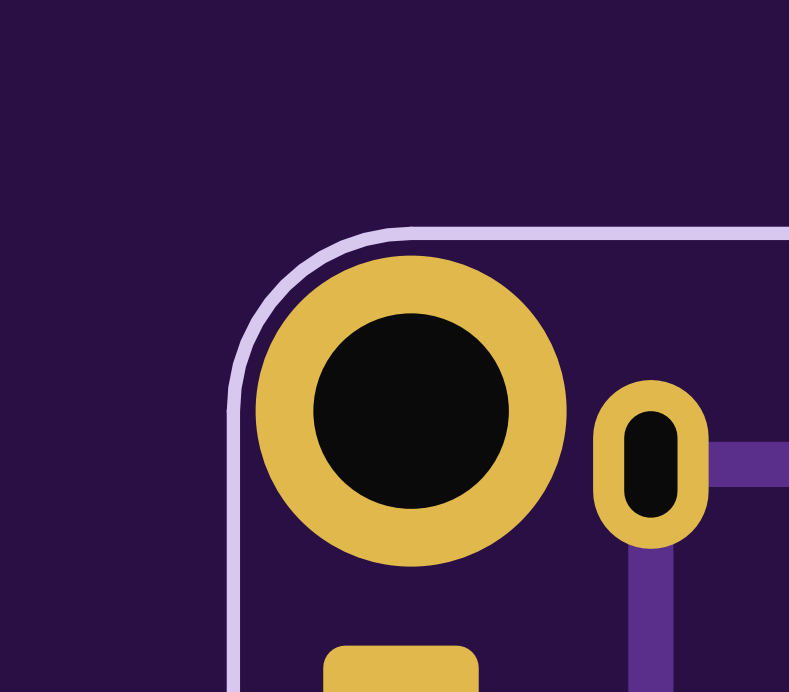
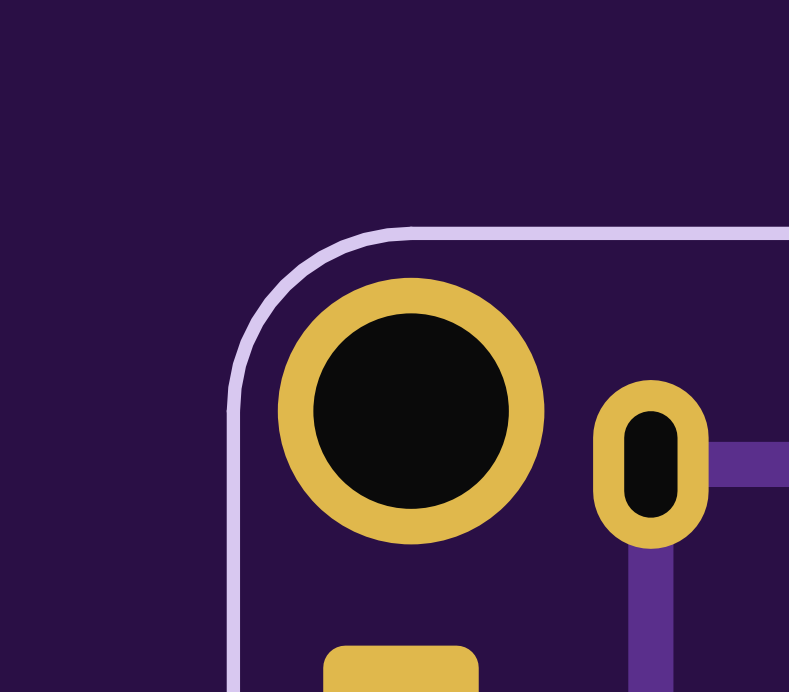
part footprint: [255, 255, 567, 567] -> [277, 277, 545, 545]

